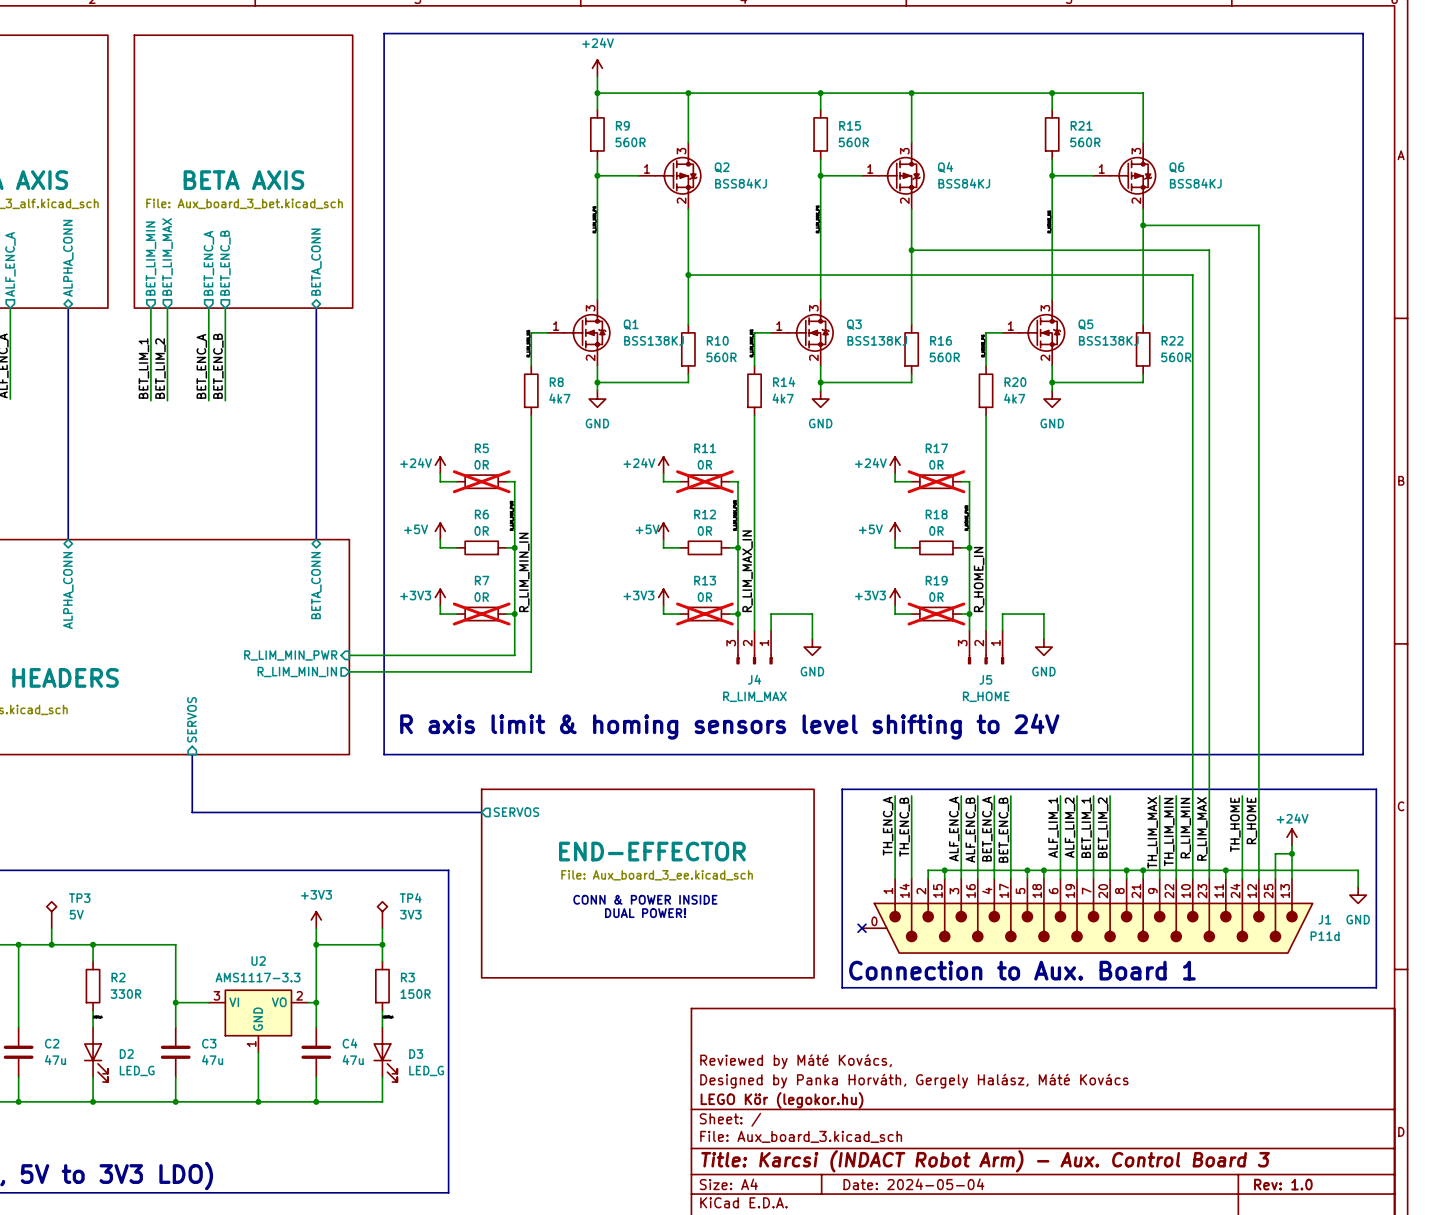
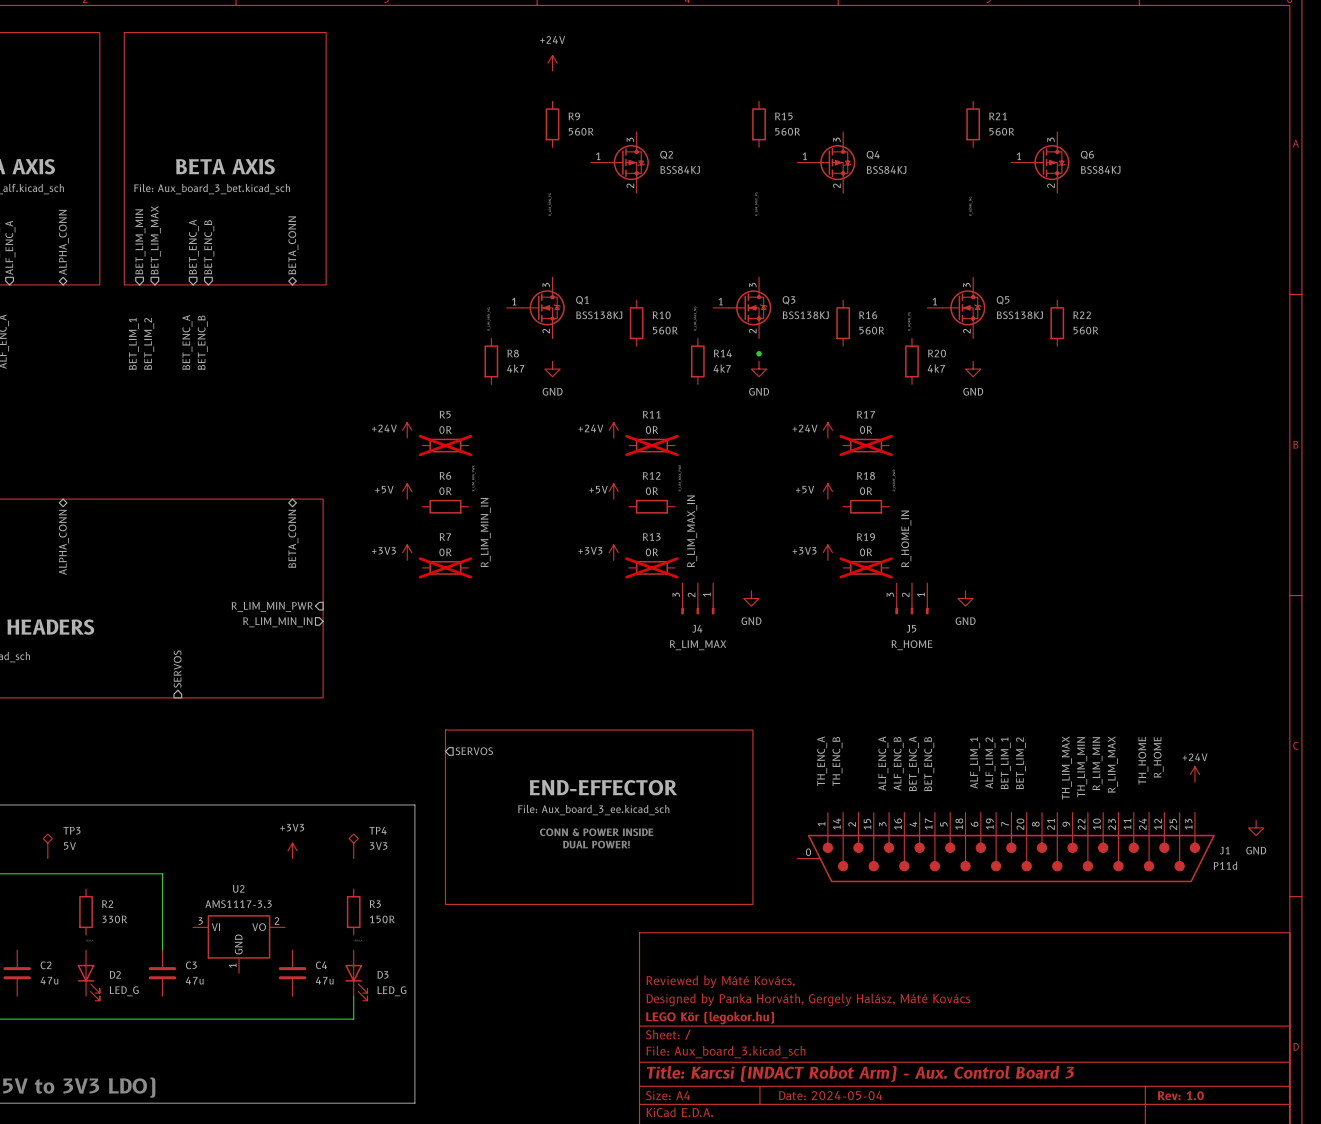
line: (384, 33) (1363, 33) (1363, 754) (384, 754) (384, 33) -> none
wire: (597, 76) (597, 109) -> none
wire: (597, 93) (1143, 93) (1143, 142) -> none
junction: (597, 93) -> none
wire: (688, 93) (688, 142) -> none
junction: (688, 93) -> none
wire: (820, 93) (820, 109) -> none
junction: (820, 93) -> none
wire: (911, 93) (911, 142) -> none
junction: (911, 93) -> none
wire: (1052, 93) (1052, 109) -> none
junction: (1052, 93) -> none
wire: (597, 159) (597, 299) -> none
wire: (820, 159) (820, 299) -> none
wire: (1052, 159) (1052, 299) -> none
wire: (597, 175) (638, 175) -> none
junction: (597, 175) -> none
wire: (820, 175) (862, 175) -> none
junction: (820, 175) -> none
wire: (1052, 175) (1093, 175) -> none
junction: (1052, 175) -> none
wire: (688, 208) (688, 324) -> none
wire: (911, 208) (911, 324) -> none
wire: (1143, 208) (1143, 324) -> none
wire: (1143, 225) (1258, 225) (1258, 878) -> none
junction: (1143, 225) -> none
wire: (911, 250) (1209, 250) (1209, 878) -> none
junction: (911, 250) -> none
wire: (688, 275) (1192, 275) (1192, 878) -> none
junction: (688, 275) -> none
wire: (10, 308) (10, 399) -> none
bus: (68, 308) (68, 539) -> none
wire: (150, 308) (150, 400) -> none
wire: (167, 308) (167, 400) -> none
wire: (208, 308) (208, 400) -> none
wire: (225, 308) (225, 400) -> none
bus: (316, 308) (316, 539) -> none
wire: (547, 332) (531, 332) (531, 365) -> none
wire: (771, 332) (754, 332) (754, 365) -> none
wire: (1002, 332) (986, 332) (986, 365) -> none
wire: (597, 365) (597, 390) -> none
wire: (820, 365) (820, 390) -> none
wire: (1052, 365) (1052, 390) -> none
wire: (688, 374) (688, 382) (597, 382) -> none
wire: (911, 374) (911, 382) (820, 382) -> none
wire: (1143, 374) (1143, 382) (1052, 382) -> none
junction: (597, 382) -> none
junction: (1052, 382) -> none
wire: (531, 415) (531, 671) (349, 671) -> none
wire: (754, 415) (754, 630) -> none
wire: (986, 415) (986, 630) -> none
wire: (440, 473) (440, 481) (456, 481) -> none
wire: (663, 473) (663, 481) (680, 481) -> none
wire: (895, 473) (895, 481) (911, 481) -> none
wire: (506, 481) (514, 481) (514, 655) (349, 655) -> none
wire: (729, 481) (737, 481) (737, 630) -> none
wire: (961, 481) (969, 481) (969, 630) -> none
wire: (440, 539) (440, 547) (456, 547) -> none
wire: (663, 539) (663, 547) (680, 547) -> none
wire: (895, 539) (895, 547) (911, 547) -> none
wire: (506, 547) (514, 547) -> none
junction: (514, 547) -> none
wire: (729, 547) (737, 547) -> none
junction: (737, 547) -> none
wire: (961, 547) (969, 547) -> none
junction: (969, 547) -> none
wire: (440, 605) (440, 614) (456, 614) -> none
wire: (663, 605) (663, 614) (680, 614) -> none
wire: (895, 605) (895, 614) (911, 614) -> none
wire: (506, 614) (514, 614) -> none
junction: (514, 614) -> none
wire: (729, 614) (737, 614) -> none
junction: (737, 614) -> none
wire: (961, 614) (969, 614) -> none
junction: (969, 614) -> none
wire: (771, 630) (771, 614) (812, 614) (812, 638) -> none
wire: (1002, 630) (1002, 614) (1043, 614) (1043, 638) -> none
text: R axis limit & homing sensors level shifting to 24V (729, 726) -> none
bus: (192, 754) (192, 812) (481, 812) -> none
line: (842, 789) (1376, 789) (1376, 987) (842, 987) (842, 789) -> none
wire: (895, 795) (895, 878) -> none
wire: (911, 795) (911, 878) -> none
wire: (961, 795) (961, 878) -> none
wire: (977, 795) (977, 878) -> none
wire: (994, 795) (994, 878) -> none
wire: (1010, 795) (1010, 878) -> none
wire: (1060, 795) (1060, 878) -> none
wire: (1077, 795) (1077, 878) -> none
wire: (1093, 795) (1093, 878) -> none
wire: (1110, 795) (1110, 878) -> none
wire: (1159, 795) (1159, 878) -> none
wire: (1176, 795) (1176, 878) -> none
wire: (1242, 795) (1242, 878) -> none
wire: (1291, 845) (1291, 878) -> none
wire: (1291, 853) (1275, 853) (1275, 878) -> none
junction: (1291, 853) -> none
wire: (944, 870) (944, 878) -> none
junction: (944, 870) -> none
wire: (1027, 870) (1027, 878) -> none
junction: (1027, 870) -> none
wire: (1043, 870) (1043, 878) -> none
junction: (1043, 870) -> none
wire: (1126, 870) (1126, 878) -> none
junction: (1126, 870) -> none
wire: (1143, 870) (1143, 878) -> none
junction: (1143, 870) -> none
wire: (1225, 870) (1225, 878) -> none
junction: (1225, 870) -> none
wire: (928, 878) (928, 870) (1358, 870) (1358, 886) -> none
wire: (51, 928) (51, 944) -> none
wire: (316, 928) (316, 1027) -> none
wire: (382, 928) (382, 961) -> none
no-connect mark: (862, 928) -> none
wire: (18, 944) (18, 1027) -> none
junction: (18, 944) -> none
junction: (51, 944) -> none
wire: (93, 944) (93, 961) -> none
junction: (93, 944) -> none
wire: (316, 944) (382, 944) -> none
junction: (316, 944) -> none
junction: (382, 944) -> none
text: Connection to Aux. Board 1 (1022, 970) -> none
wire: (175, 1002) (208, 1002) -> none
junction: (175, 1002) -> none
wire: (308, 1002) (316, 1002) -> none
junction: (316, 1002) -> none
wire: (93, 1010) (93, 1027) -> none
wire: (382, 1010) (382, 1027) -> none
wire: (258, 1052) (258, 1101) -> none
wire: (18, 1077) (18, 1101) -> none
wire: (93, 1077) (93, 1101) -> none
wire: (175, 1077) (175, 1101) -> none
wire: (316, 1077) (316, 1101) -> none
junction: (18, 1101) -> none
junction: (93, 1101) -> none
junction: (175, 1101) -> none
junction: (258, 1101) -> none
junction: (316, 1101) -> none

